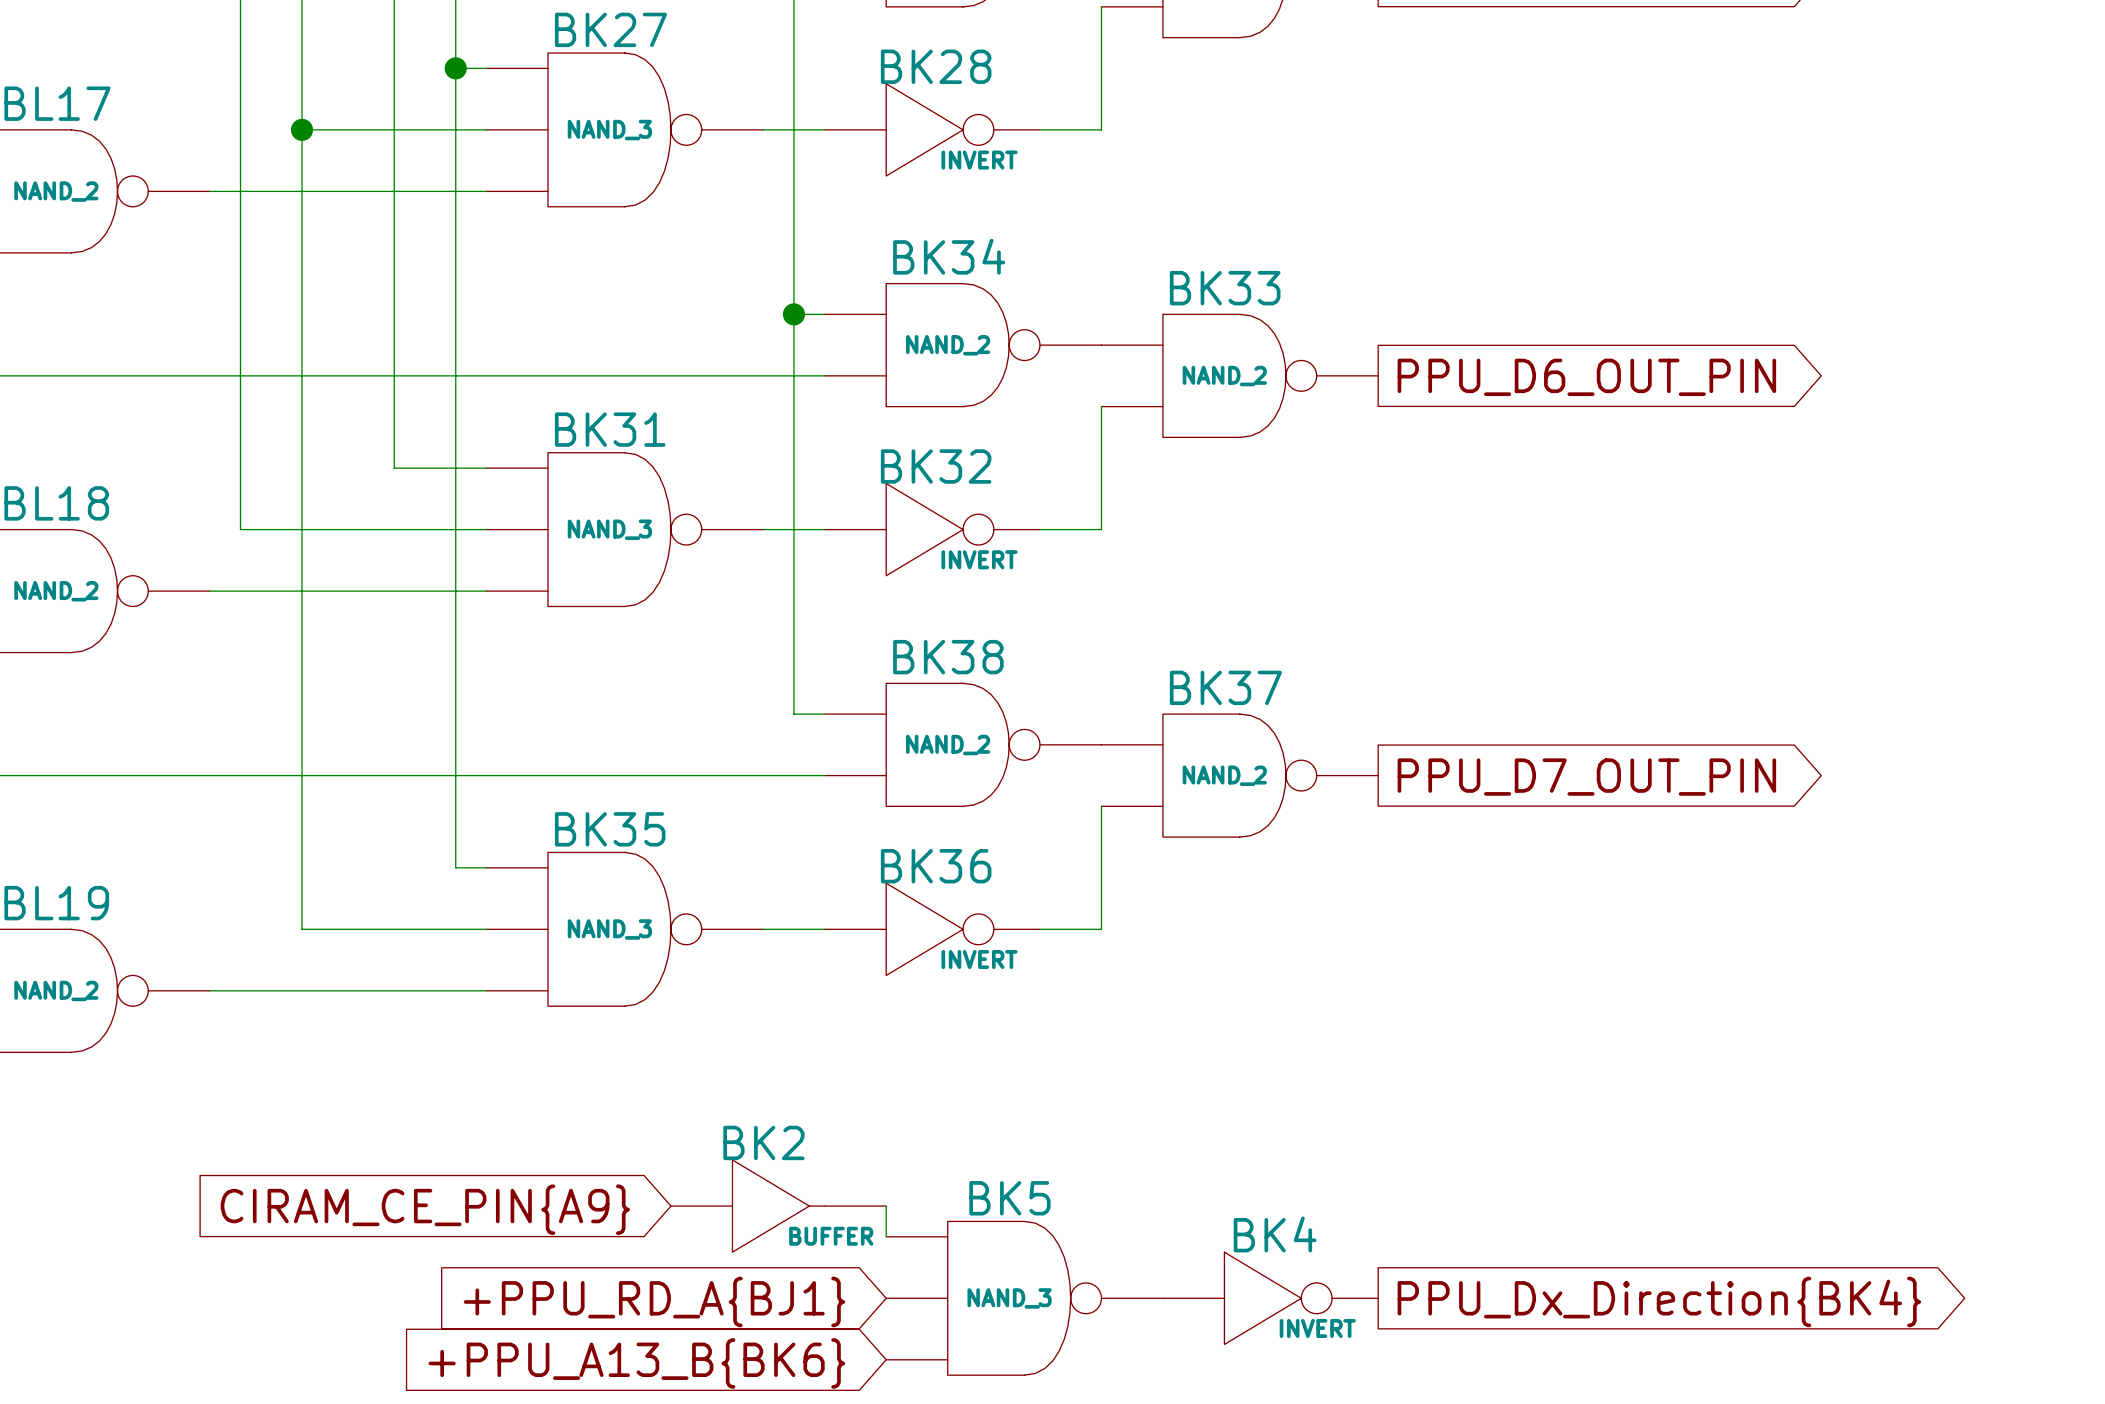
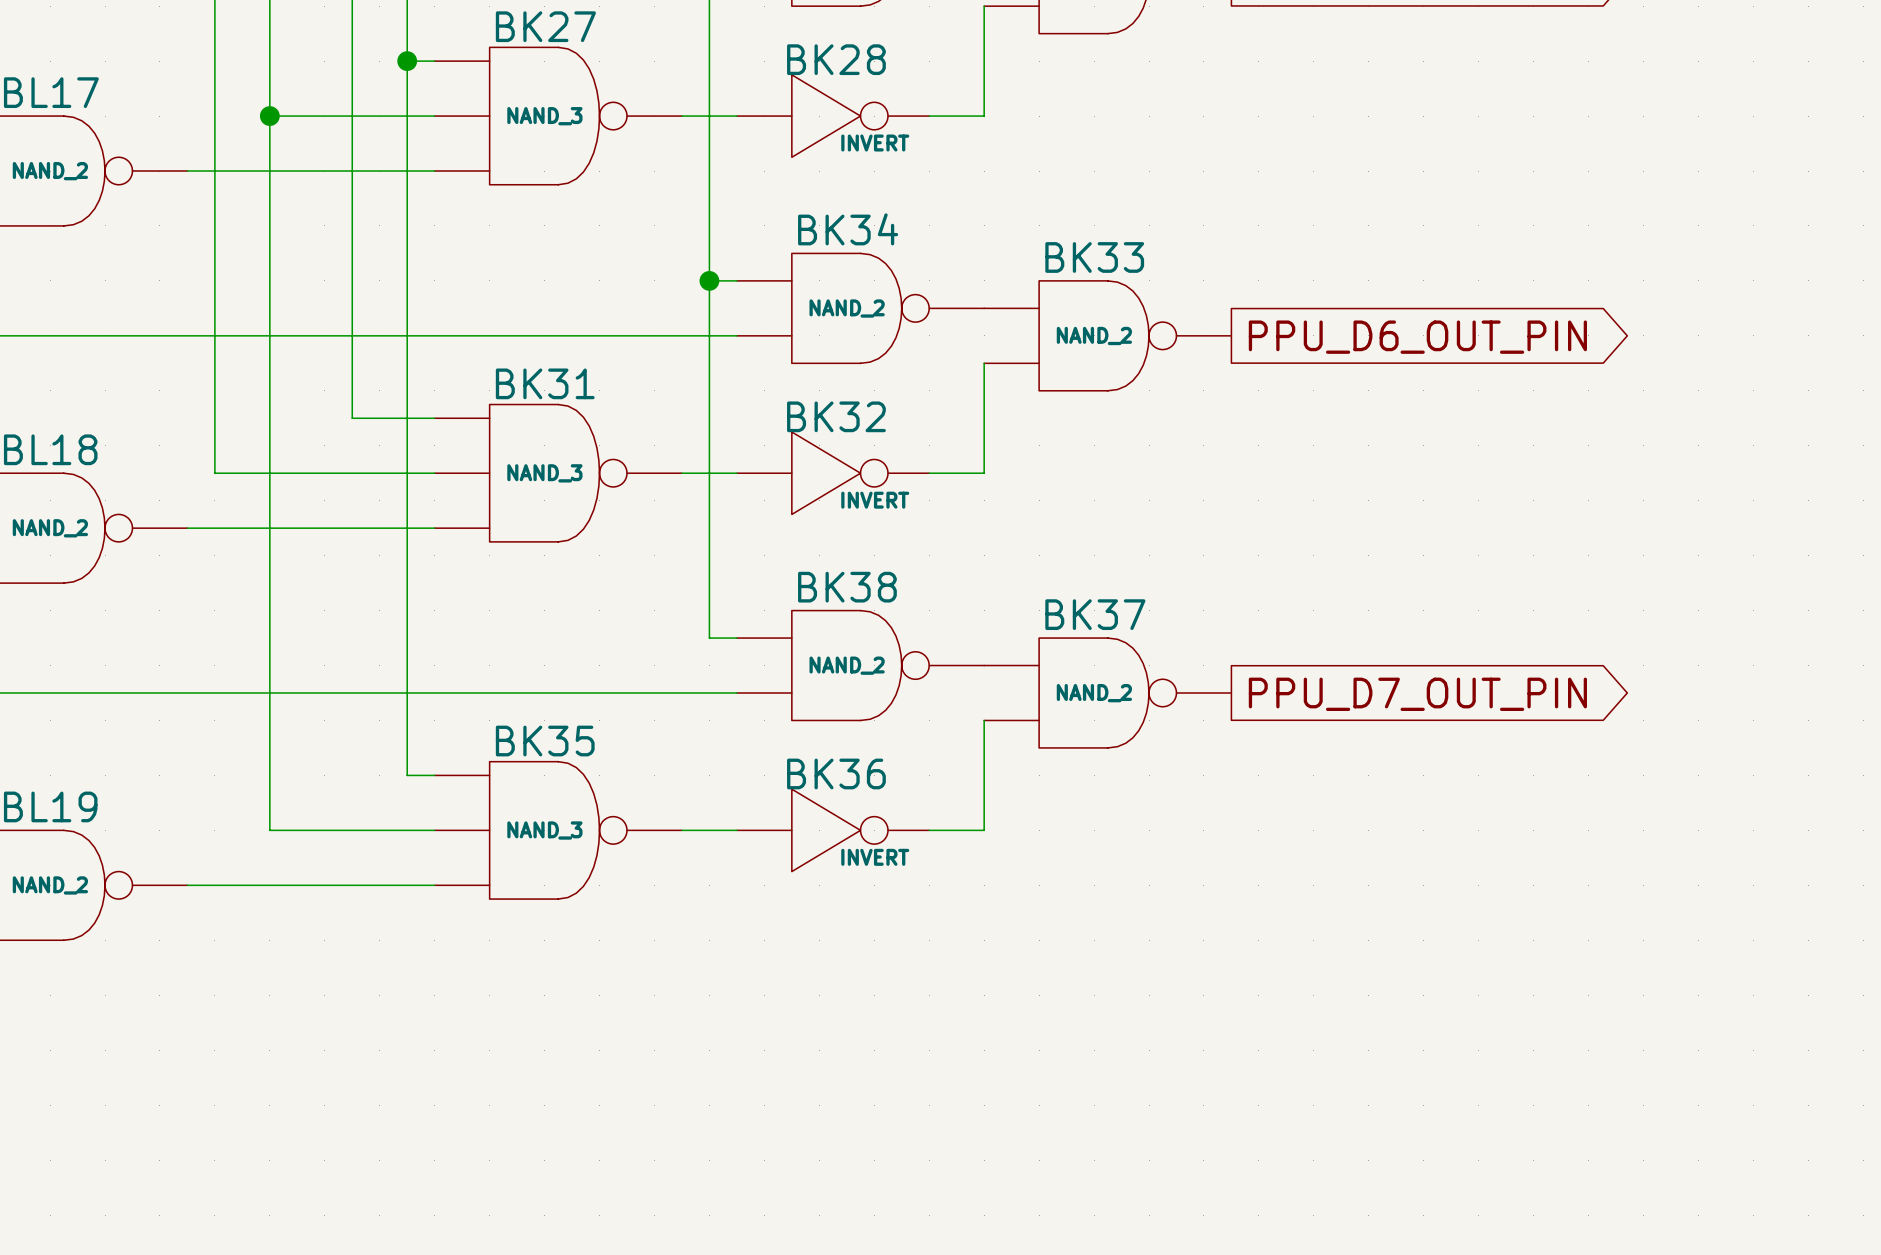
BK2: BUFFER (778, 1206) -> none
wire: (886, 1206) (886, 1236) -> none
global label: CIRAM_CE_PIN{A9} (425, 1209) -> none
BK5: NAND_3 (1024, 1298) -> none
BK4: INVERT (1270, 1298) -> none
global label: +PPU_RD_A{BJ1} (654, 1301) -> none
global label: PPU_Dx_Direction{BK4} (1659, 1301) -> none
global label: +PPU_A13_B{BK6} (636, 1363) -> none

